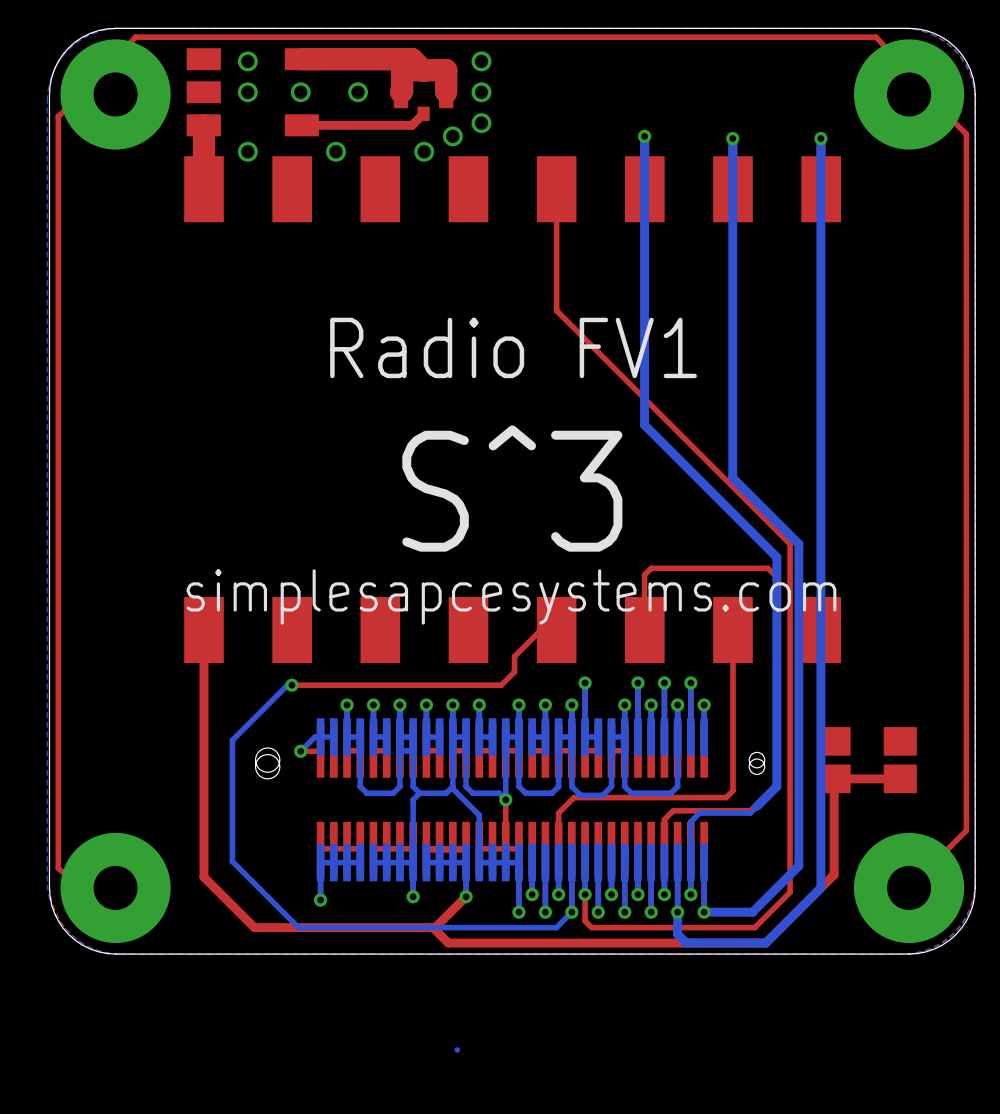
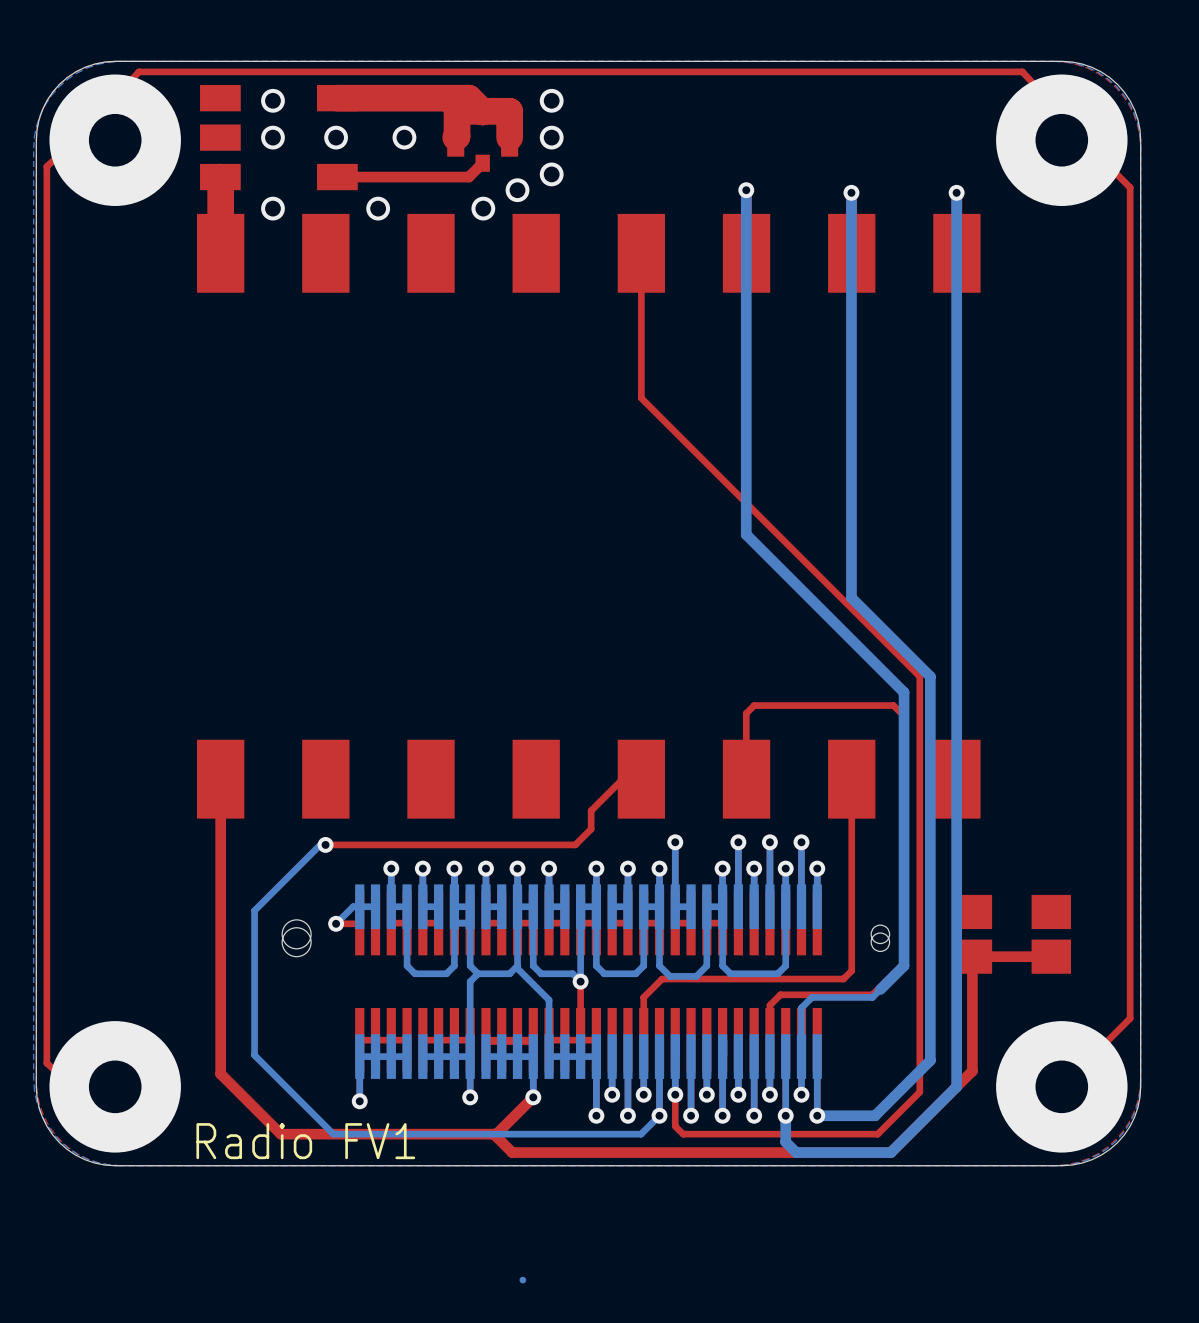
text: Radio FV1 (513, 347) -> none
text: S^3 (512, 488) -> none
text: simplesapcesystems.com (511, 596) -> none
text: none -> Radio FV1 (305, 1141)

